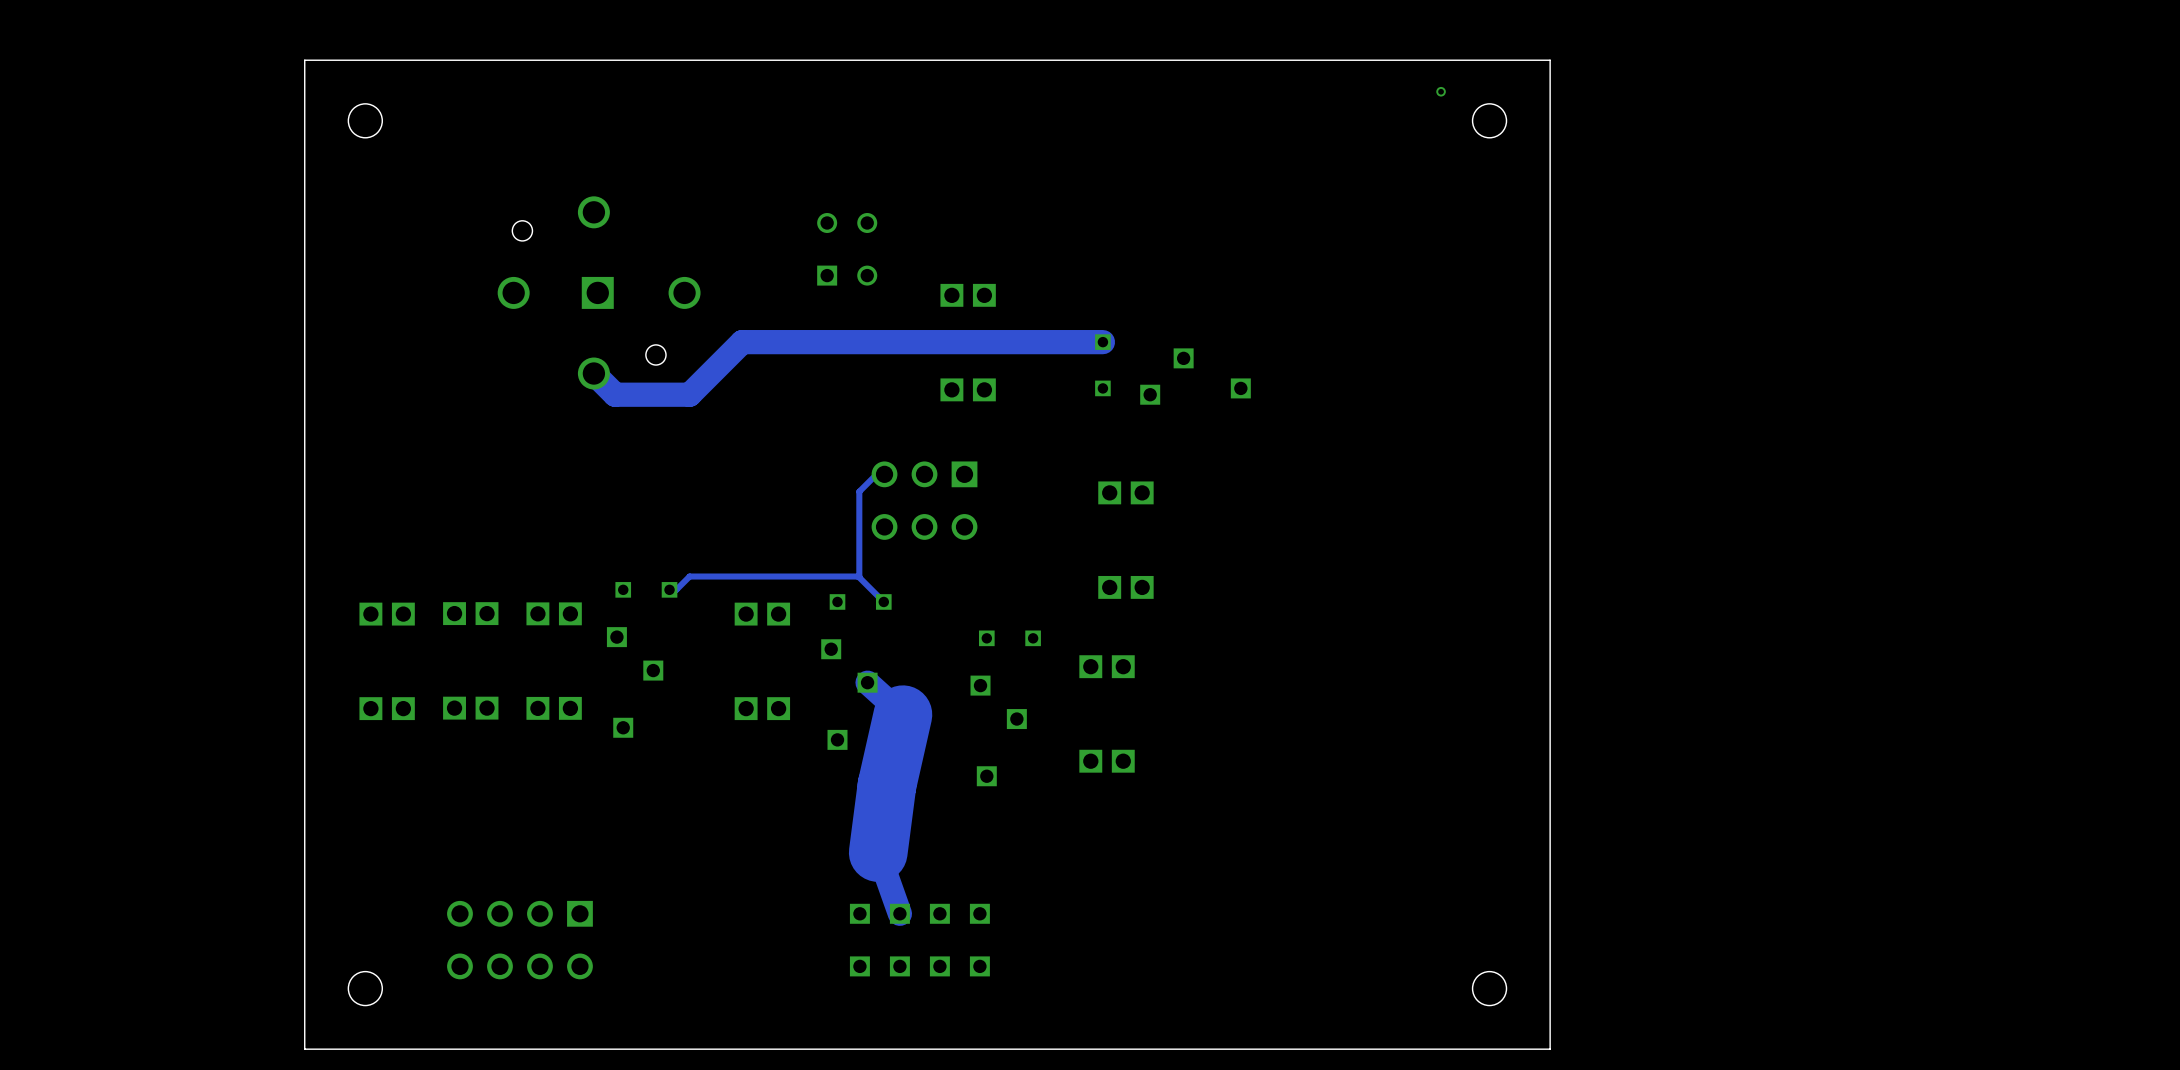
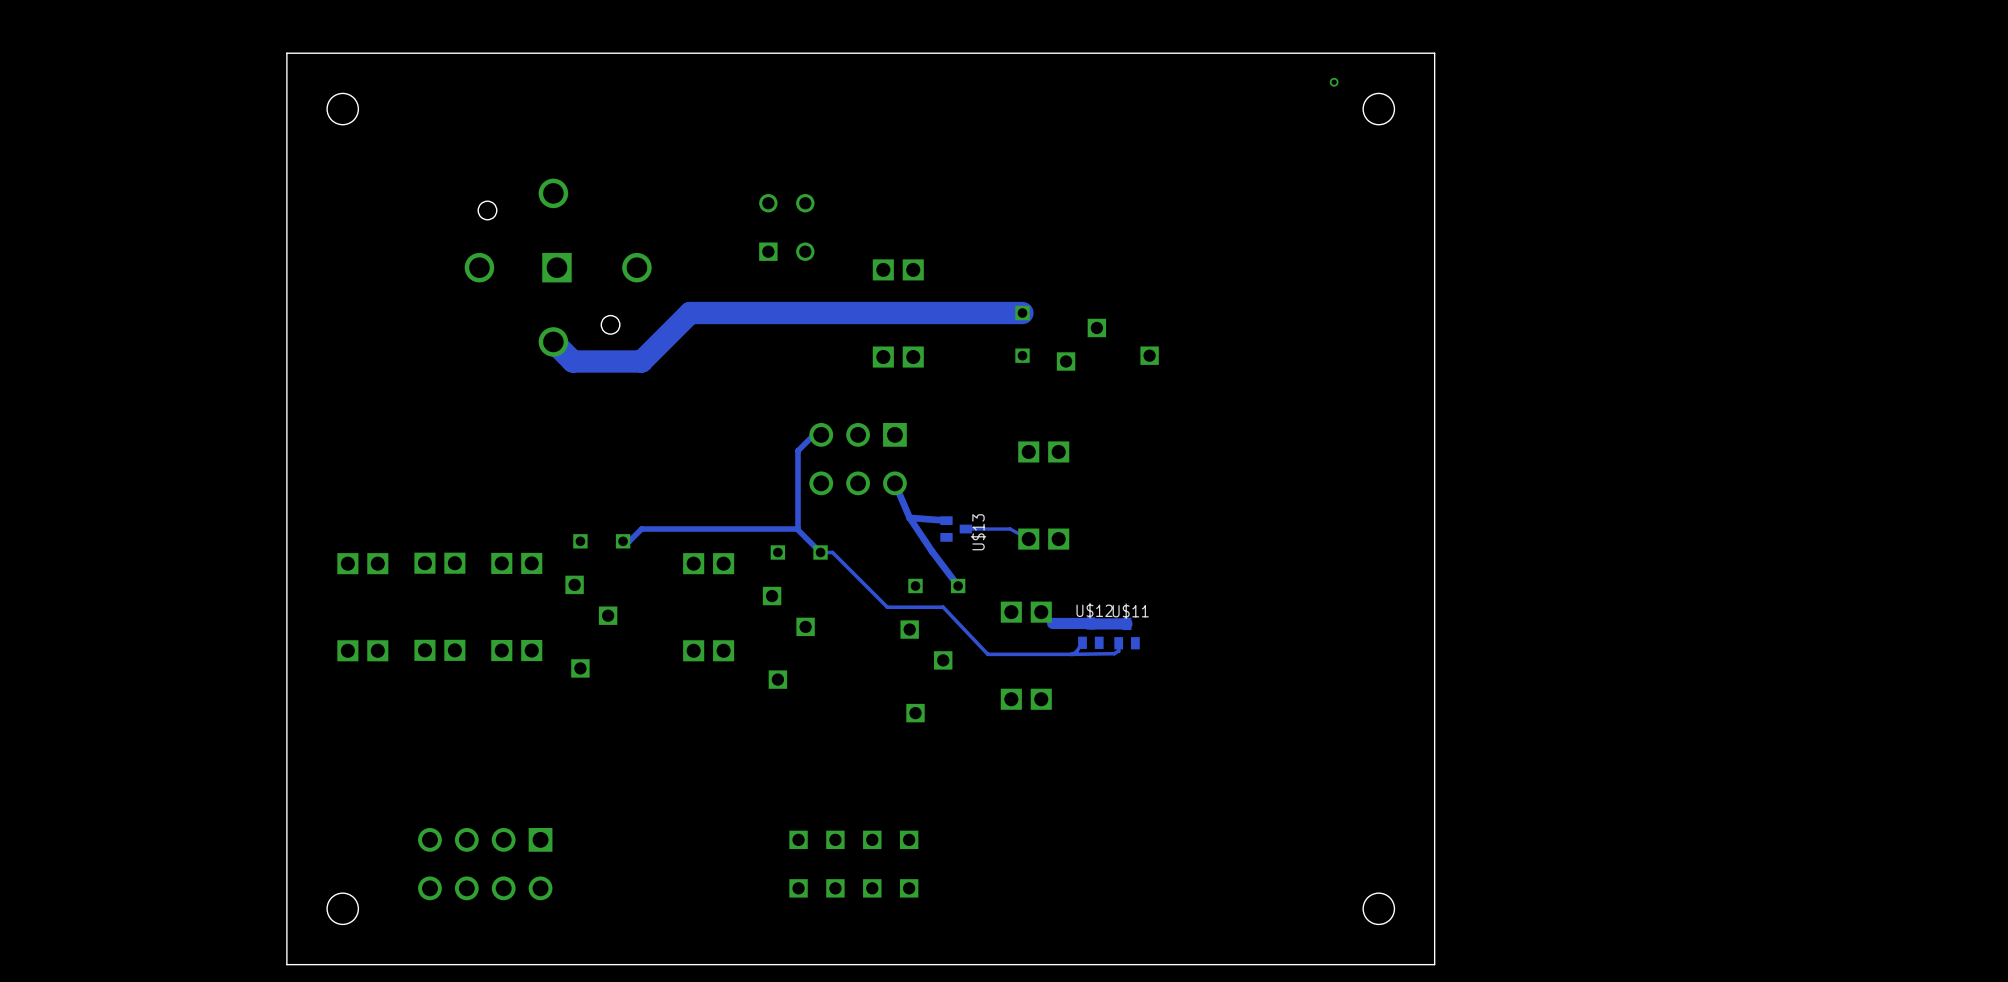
track: none -> (894, 483) (909, 517)
track: none -> (909, 517) (946, 520)
track: none -> (909, 517) (958, 585)
U$13: none -> (956, 529)
track: none -> (965, 529) (1010, 529) (1028, 539)
track: none -> (820, 552) (832, 552) (887, 607) (943, 607) (987, 654) (1072, 654) (1082, 642)
track: none -> (1041, 612) (1052, 623) (1127, 623)
track: (867, 682) (902, 714) (886, 785) (878, 852) (899, 913) -> none
U$12: none -> (1090, 633)
U$11: none -> (1127, 633)
track: none -> (1118, 643) (1118, 651) (1114, 653) (1071, 654)

